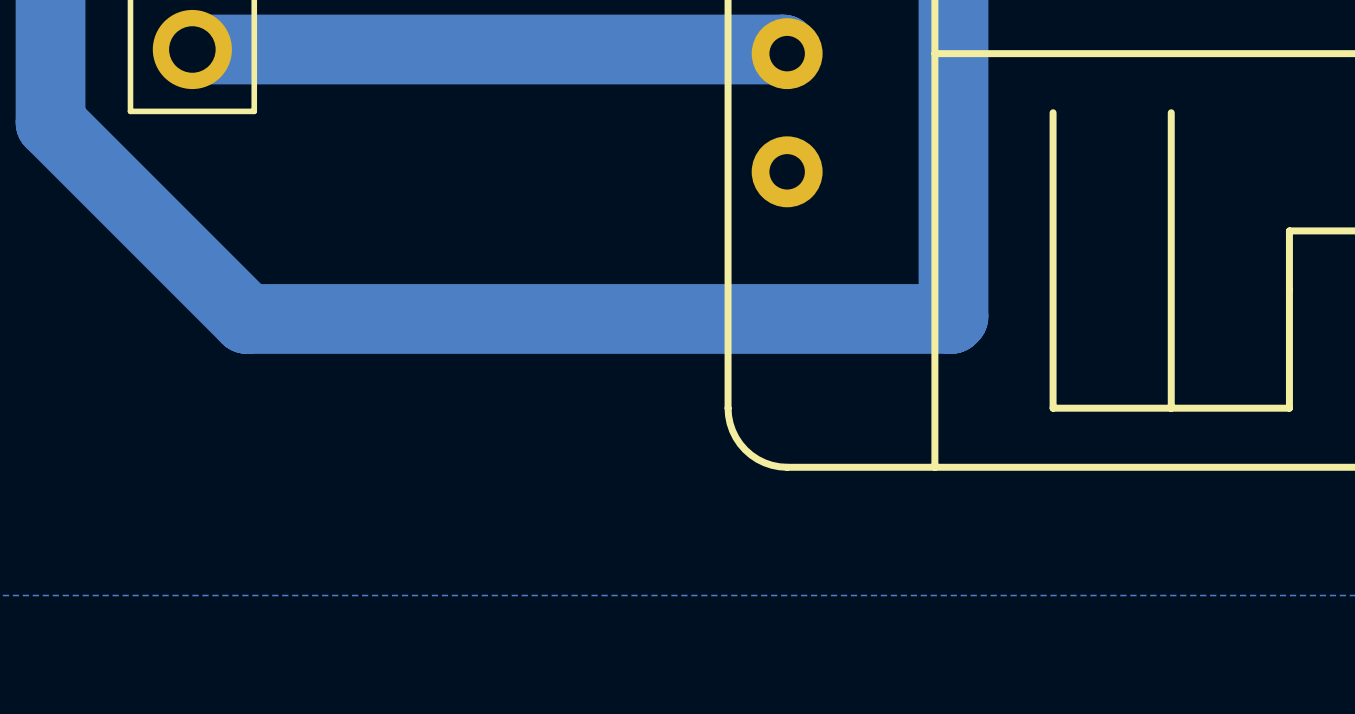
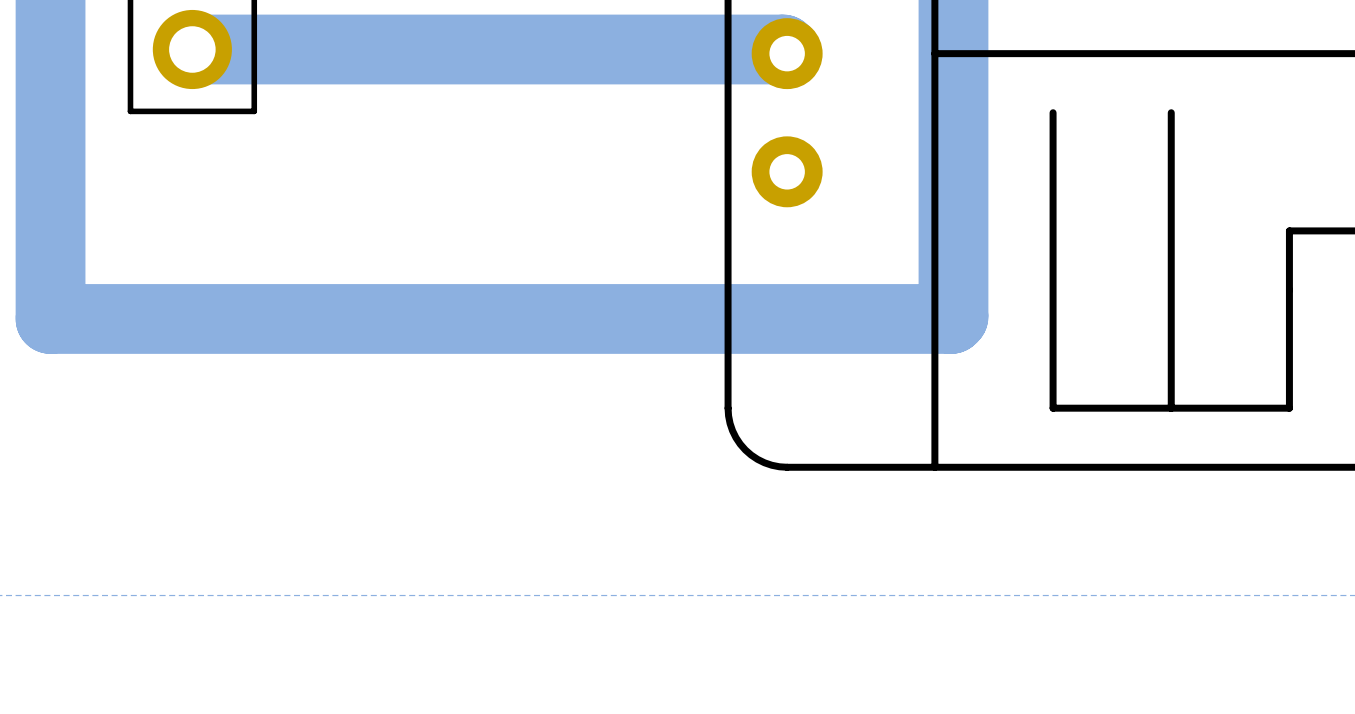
bottom track: (50, 122) (246, 318) -> (50, 122) (50, 318) (246, 318)

